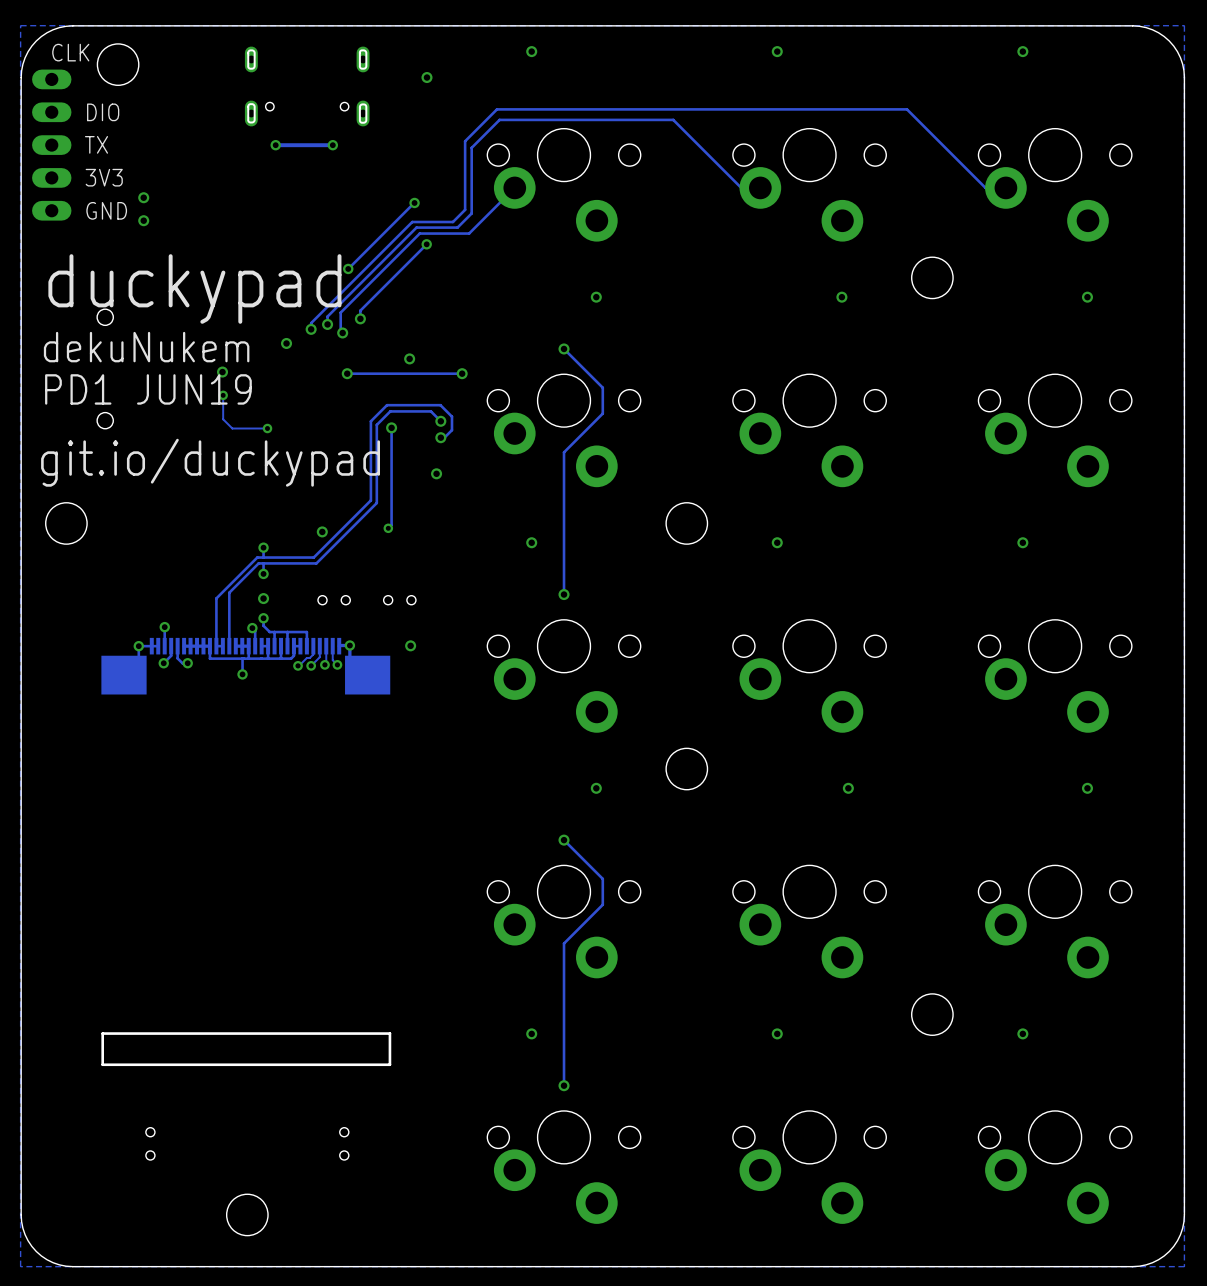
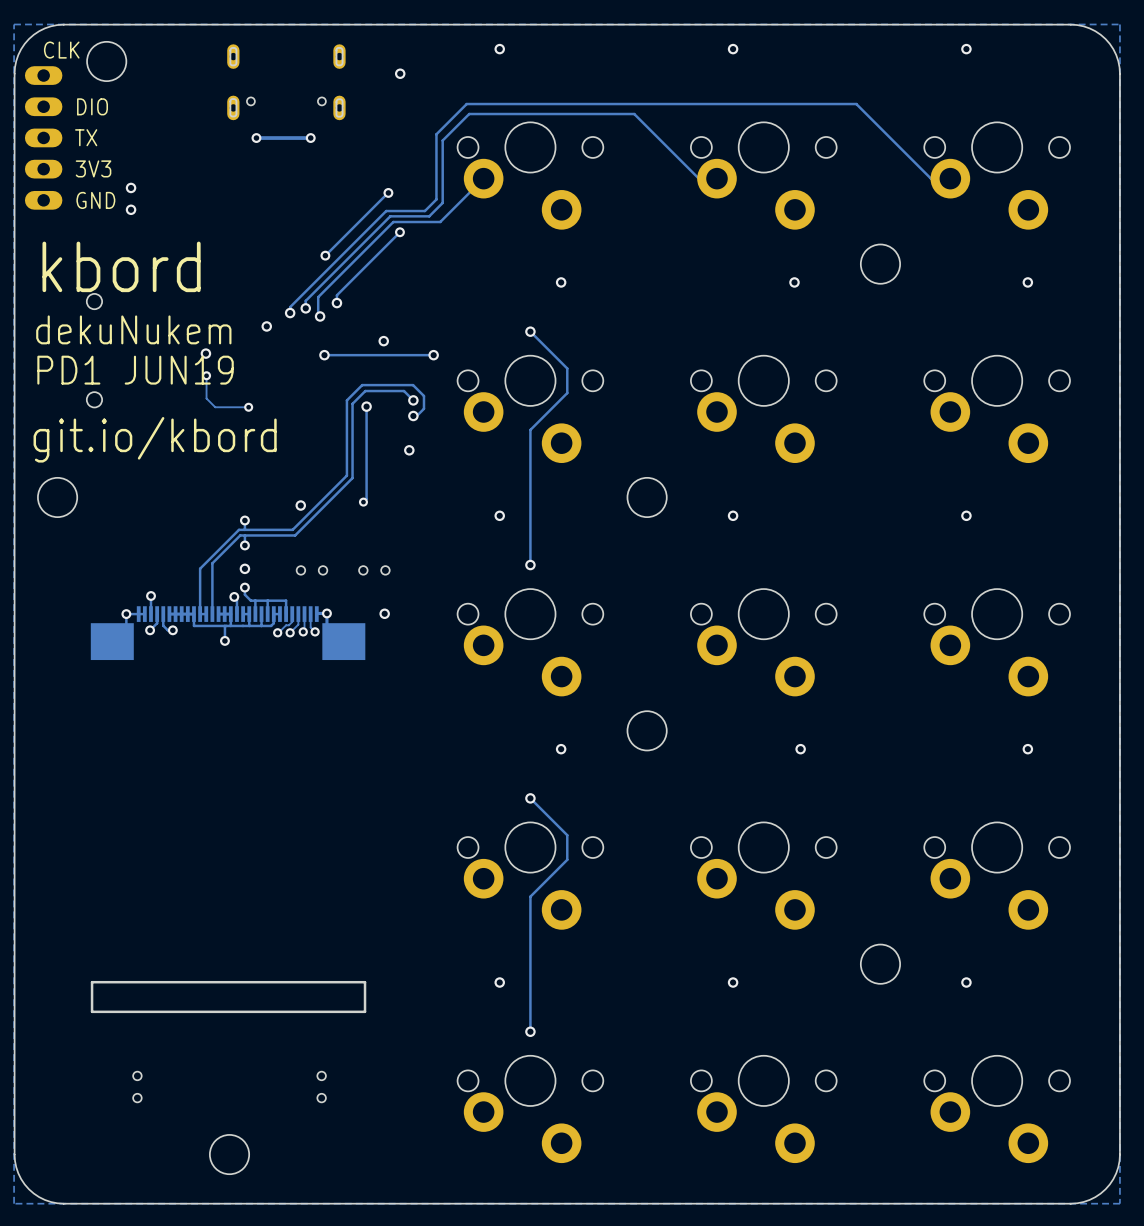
text: duckypad (194, 288) -> kbord (121, 266)
text: git.io/duckypad (210, 462) -> git.io/kbord (155, 439)

